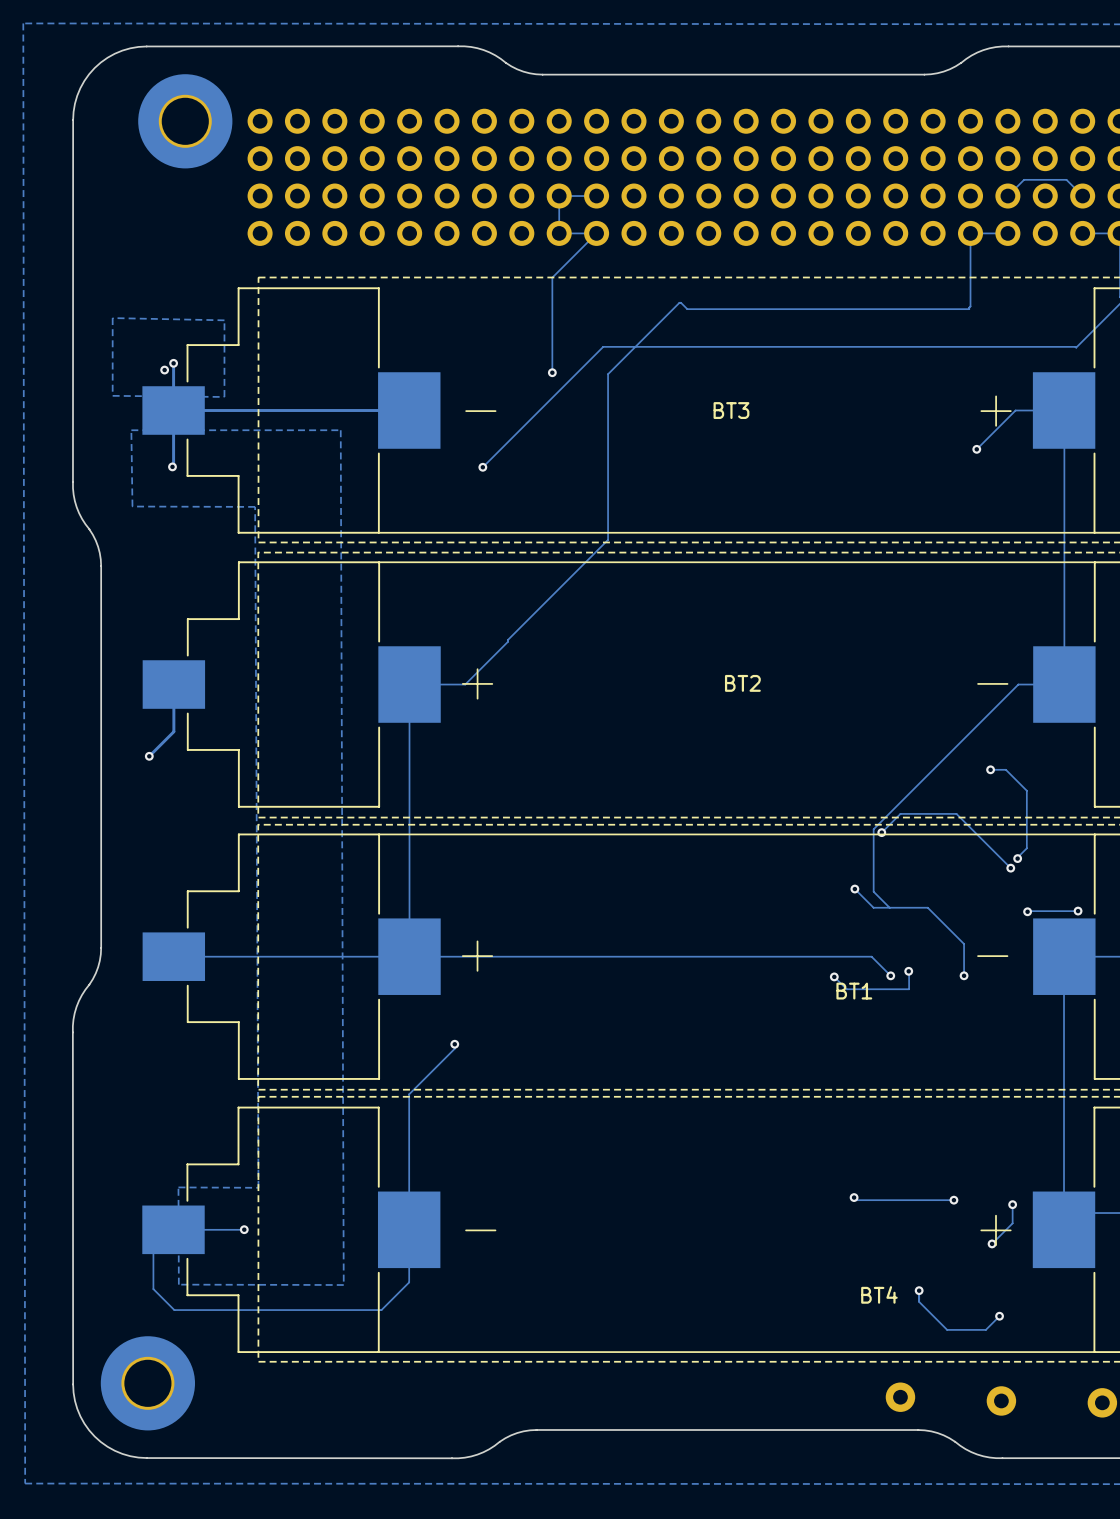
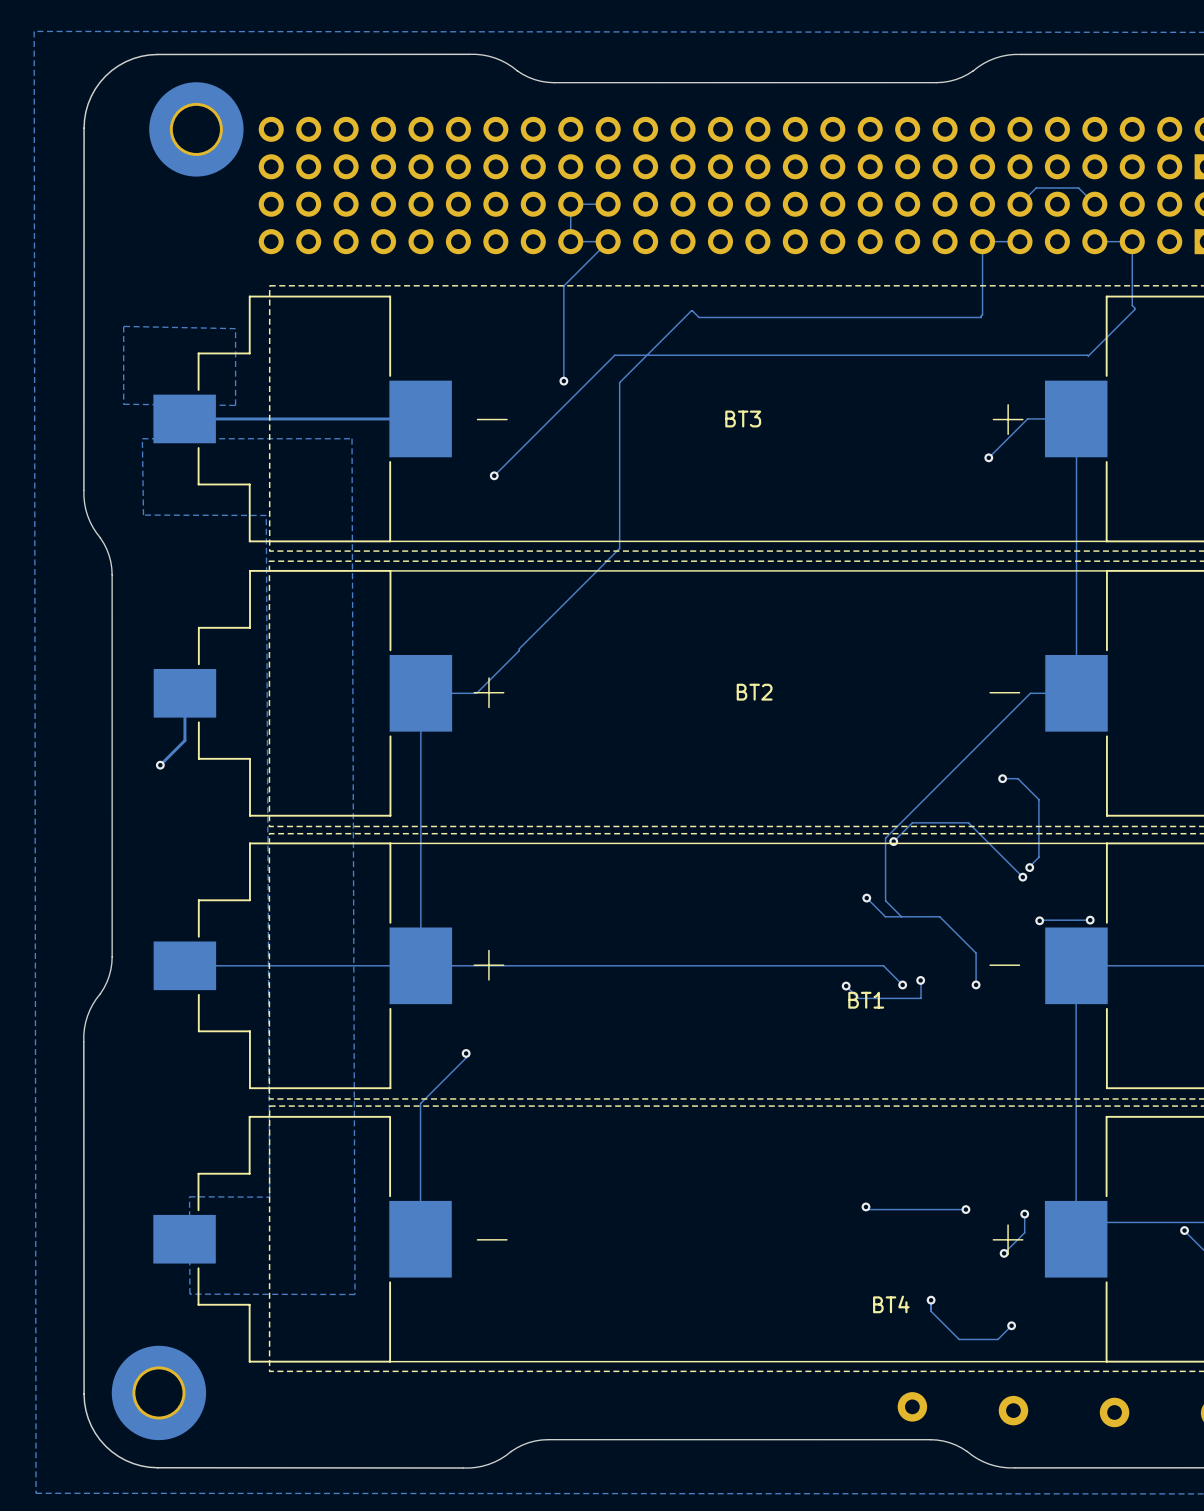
track: (173, 363) (172, 466) -> none
via: (173, 363) -> none
via: (164, 370) -> none
via: (172, 466) -> none
via: (244, 1229) -> none
track: (409, 1229) (409, 1282) (381, 1310) (174, 1310) (153, 1289) (153, 1249) (173, 1229) (244, 1229) -> none

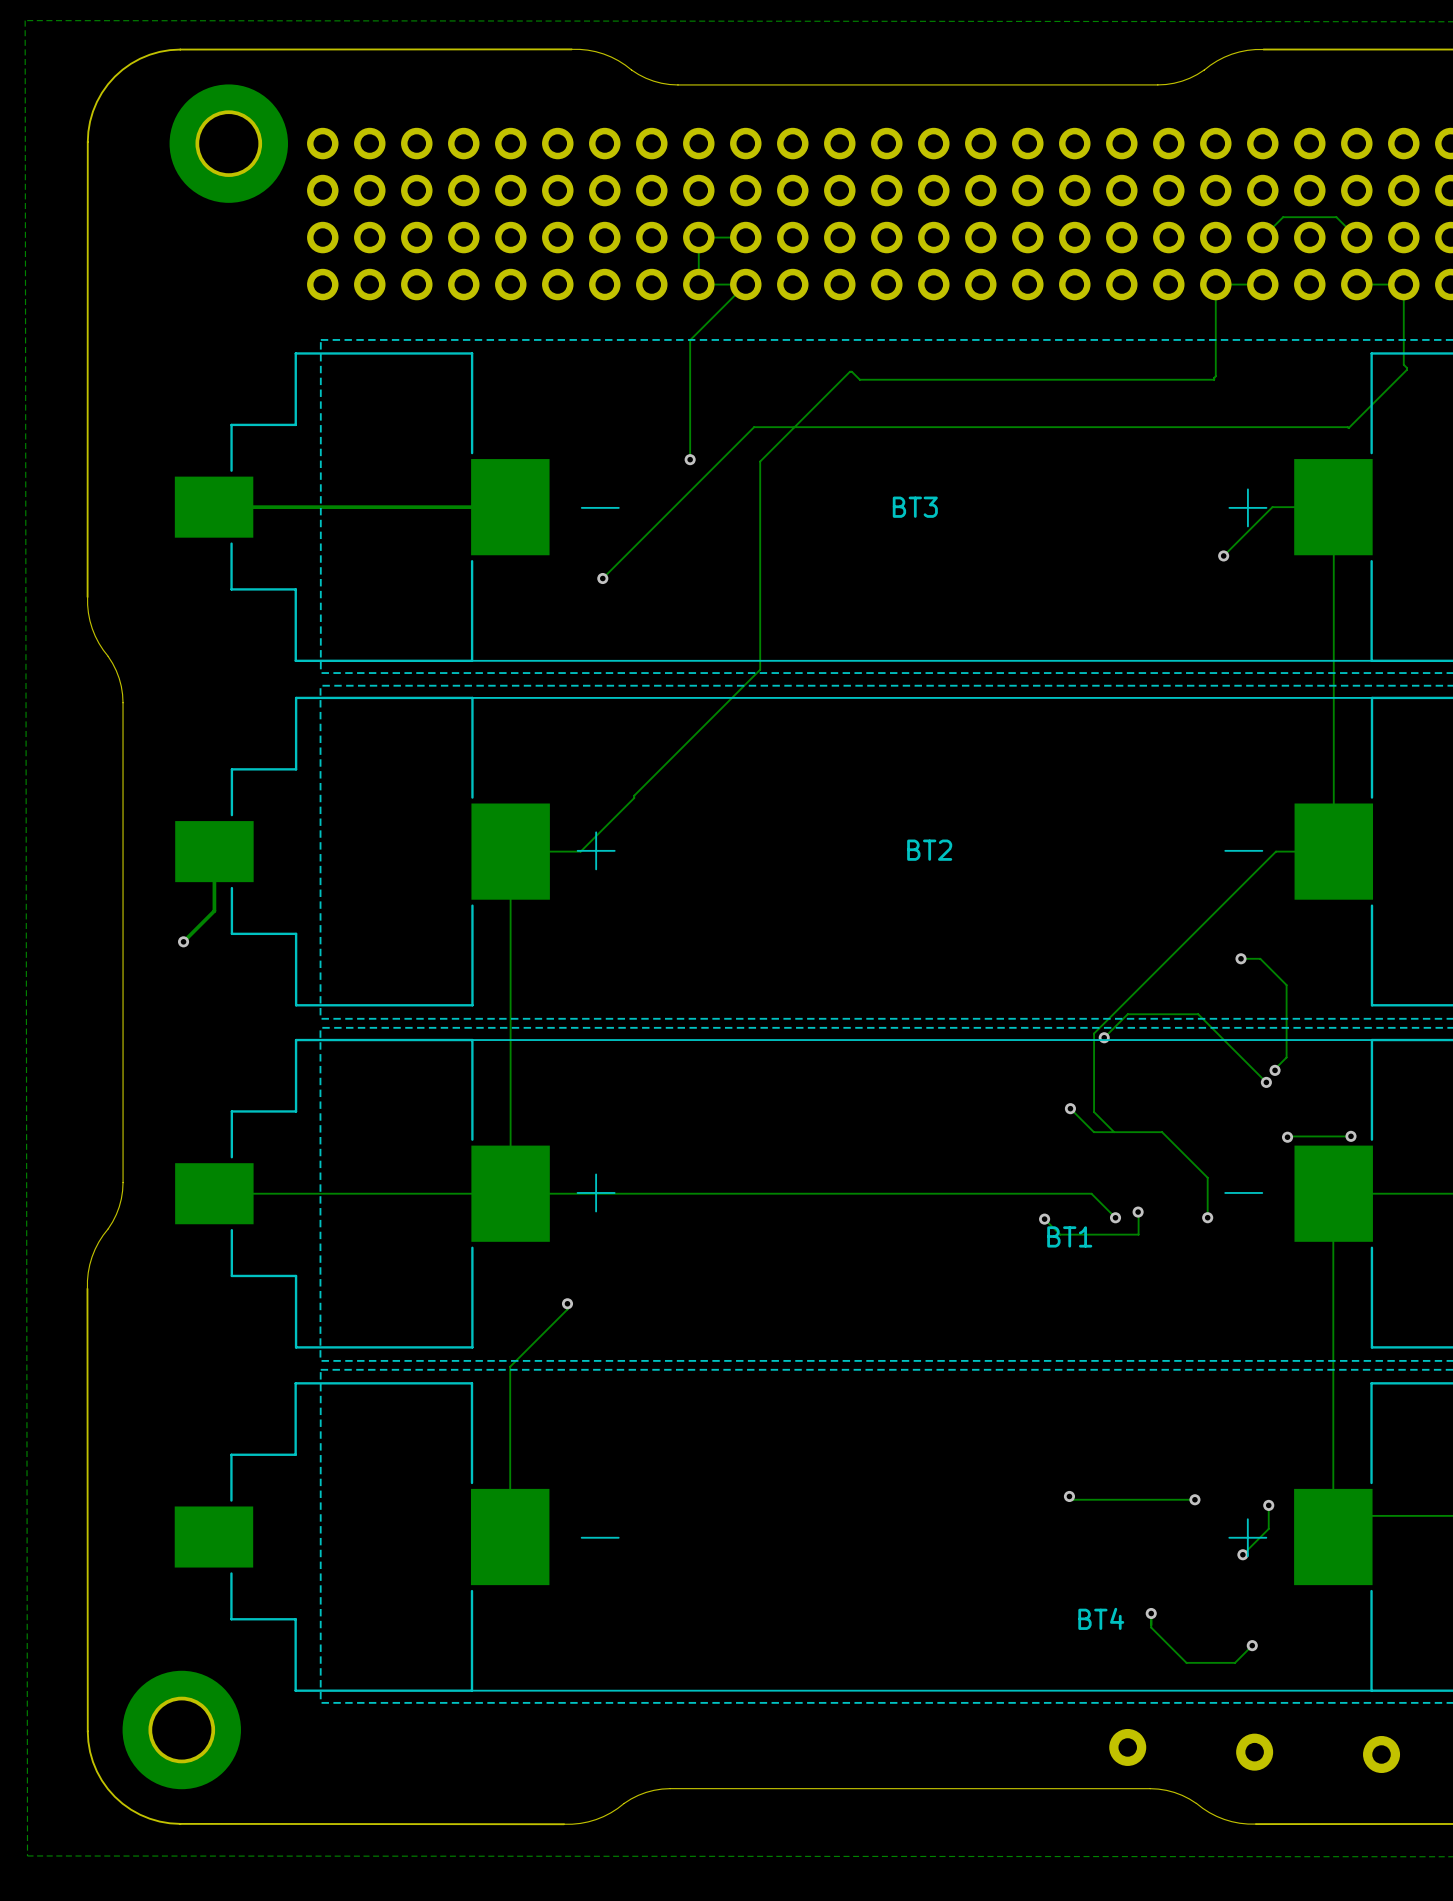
zone outline: (123, 326) (235, 328) (235, 405) (123, 404) (123, 326) -> none
zone outline: (352, 438) (355, 1294) (189, 1294) (189, 1196) (269, 1197) (266, 515) (143, 515) (142, 438) (352, 438) -> none

